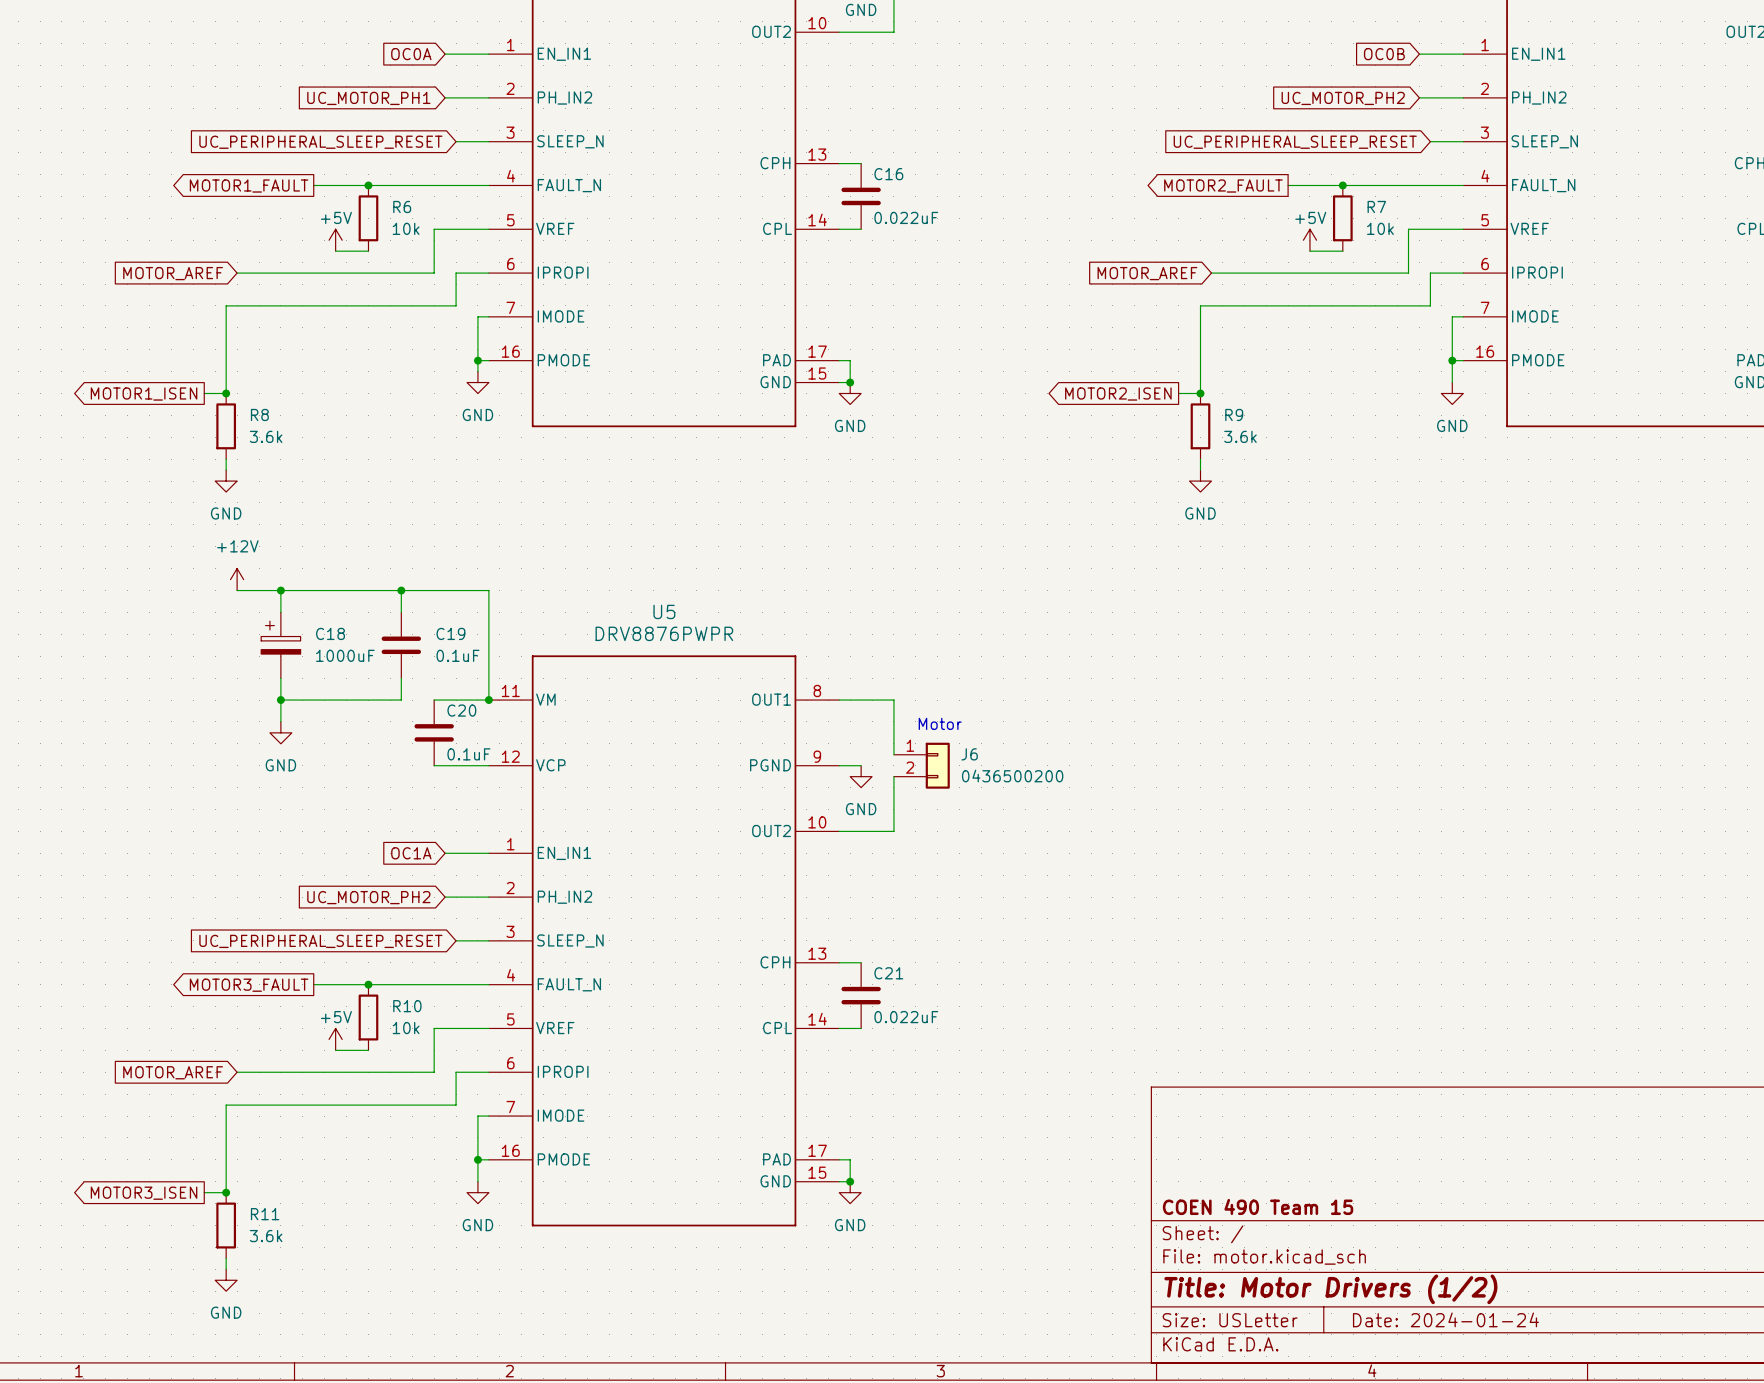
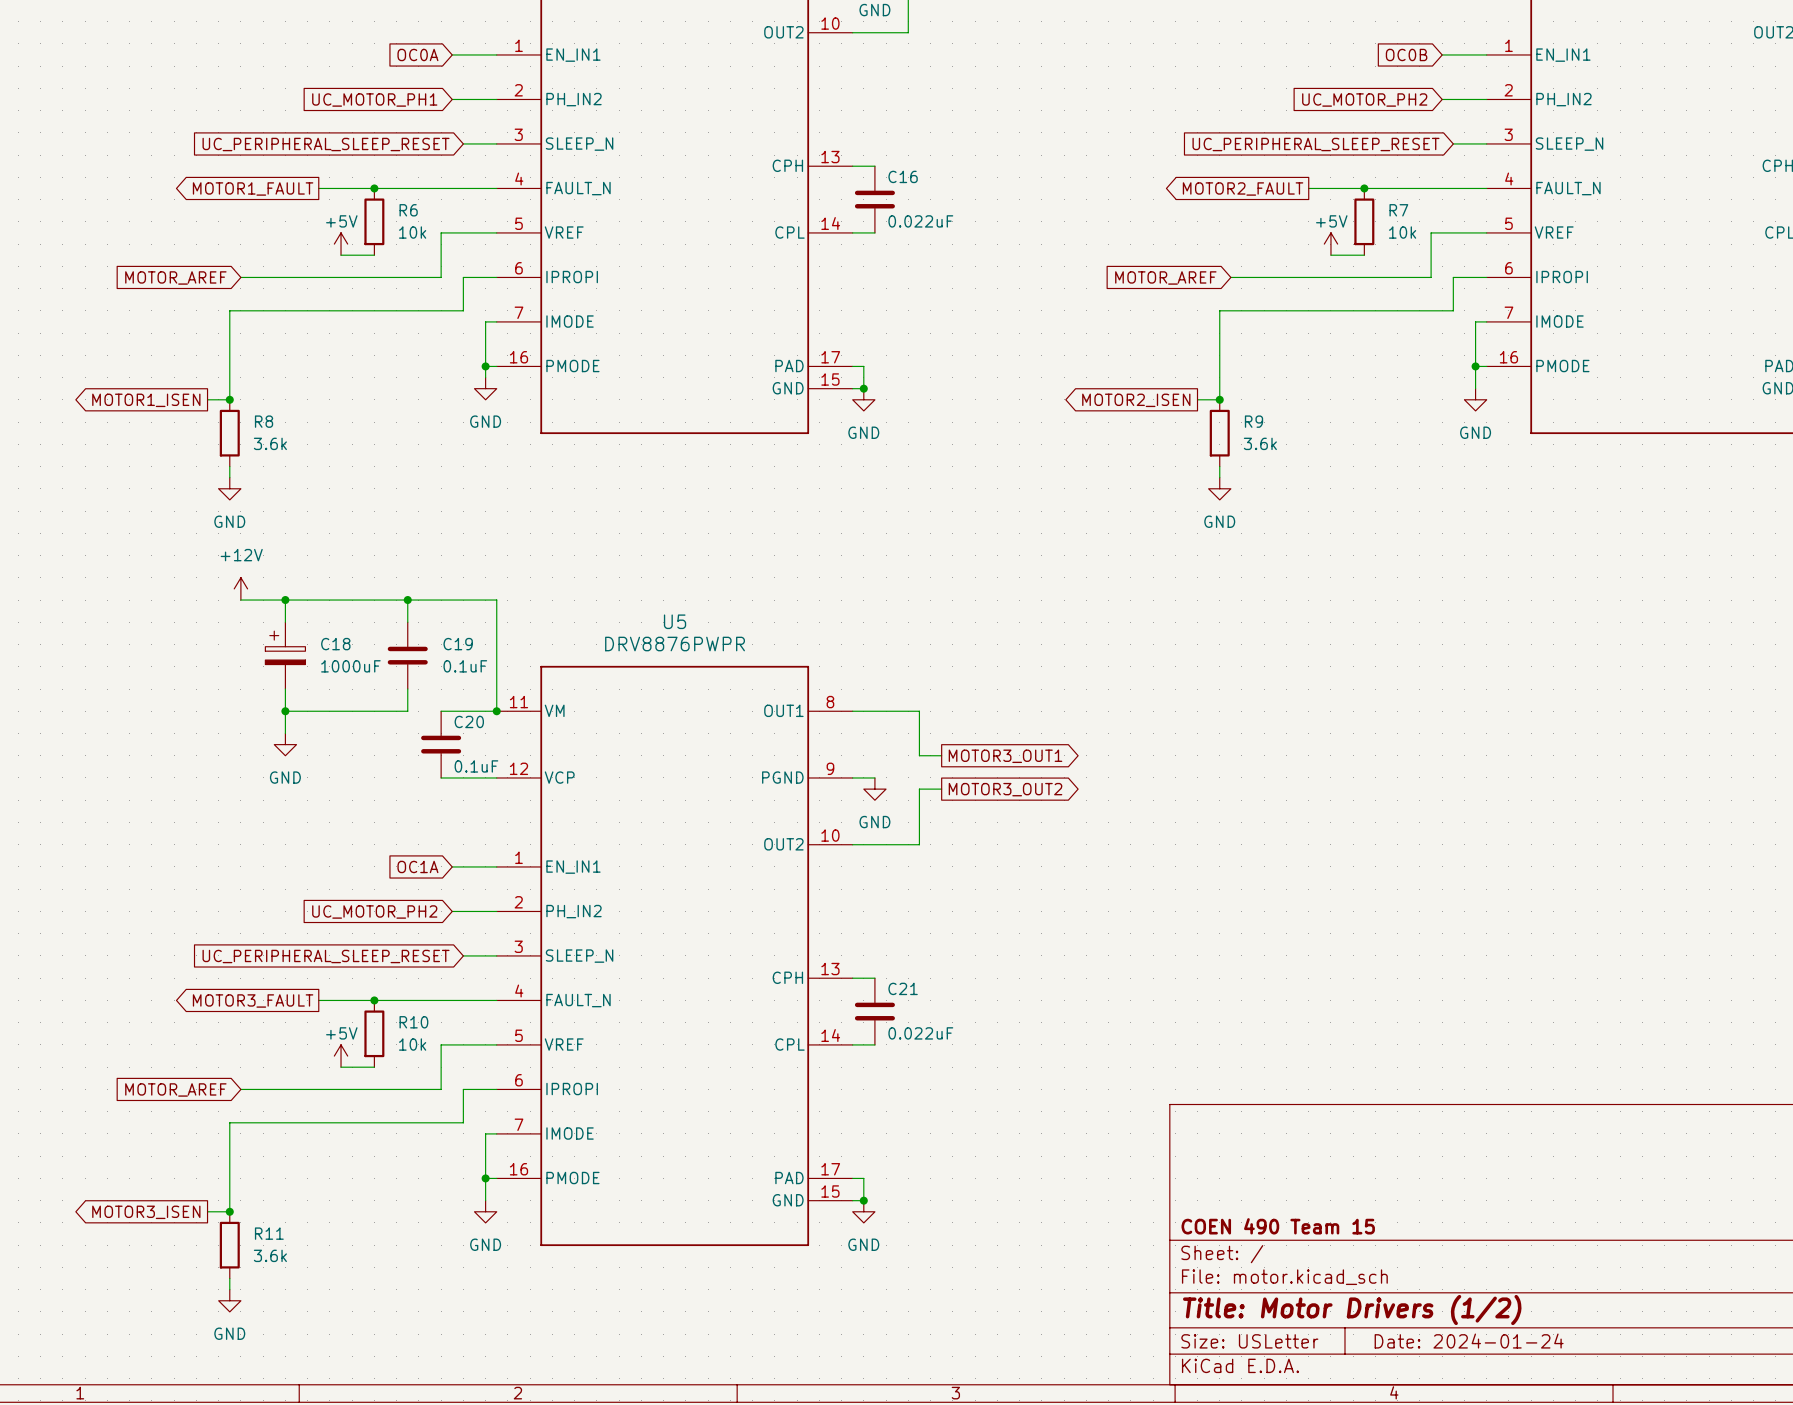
wire: (893, 700) (893, 754) -> (908, 711) (919, 711) (919, 755) (941, 755)
text: Motor (940, 723) -> none
global label: none -> MOTOR3_OUT1 (1005, 756)
J6: 0436500200 (921, 765) -> none
wire: (893, 776) (893, 831) -> (941, 789) (919, 789) (919, 844) (908, 844)
global label: none -> MOTOR3_OUT2 (1005, 789)

